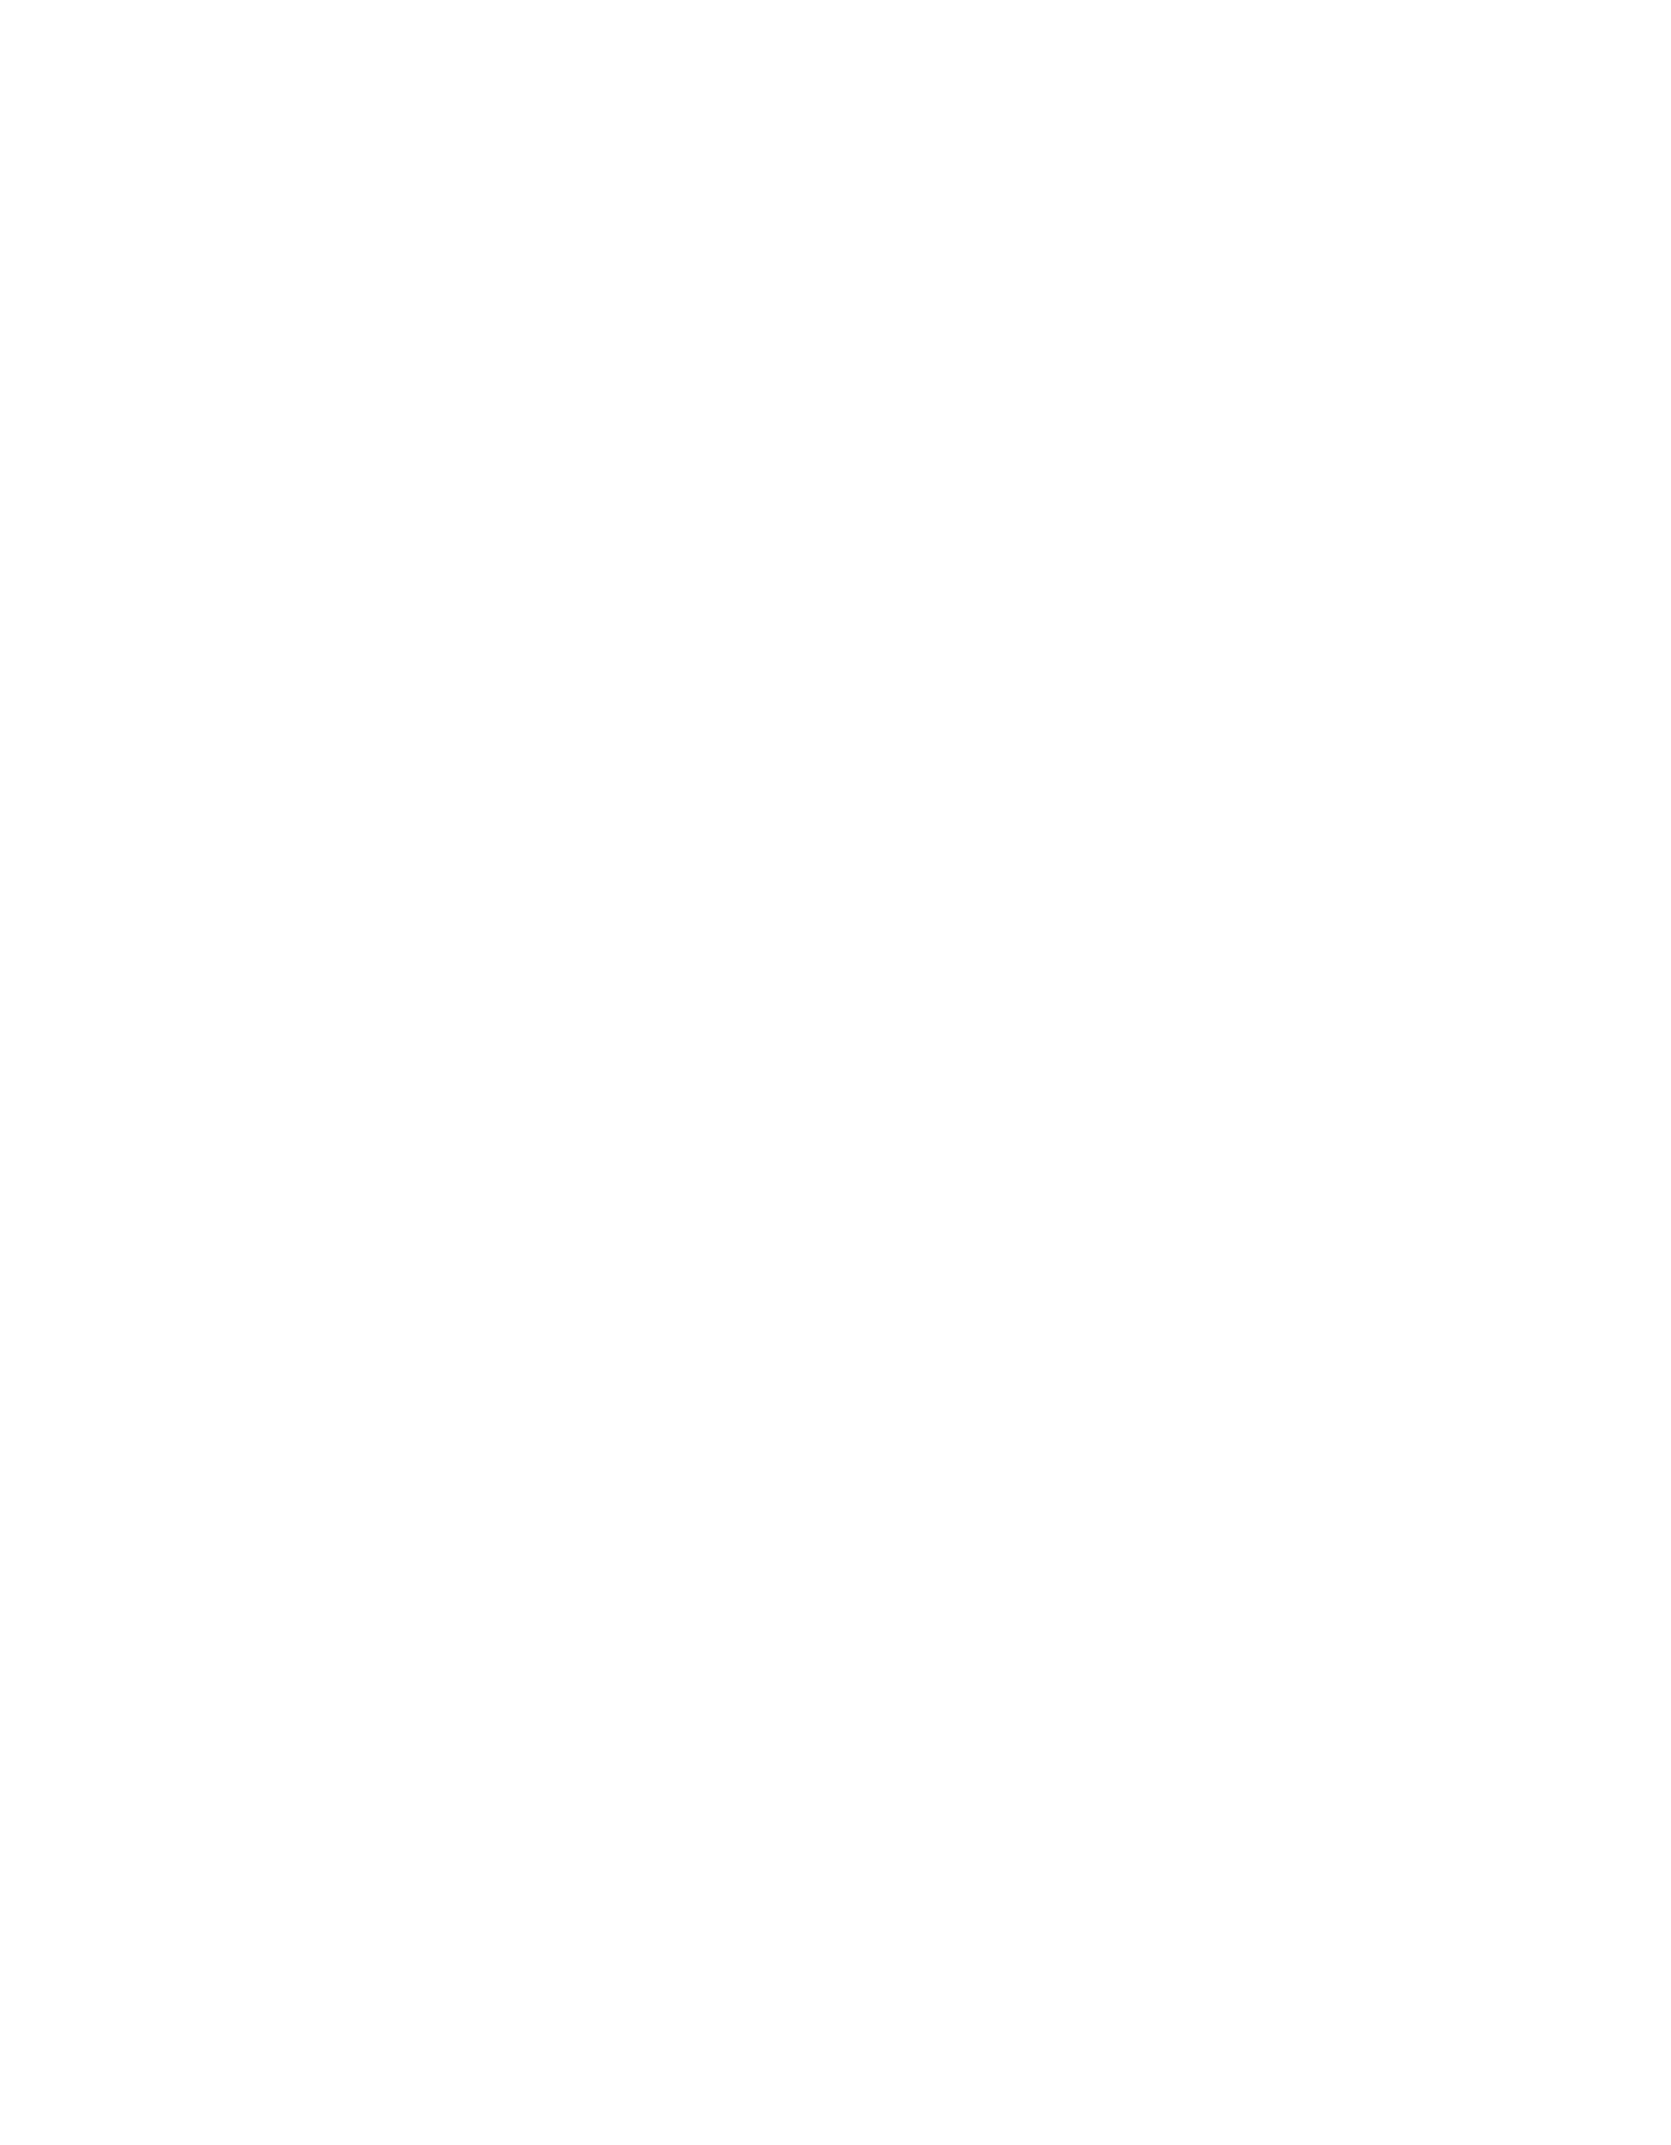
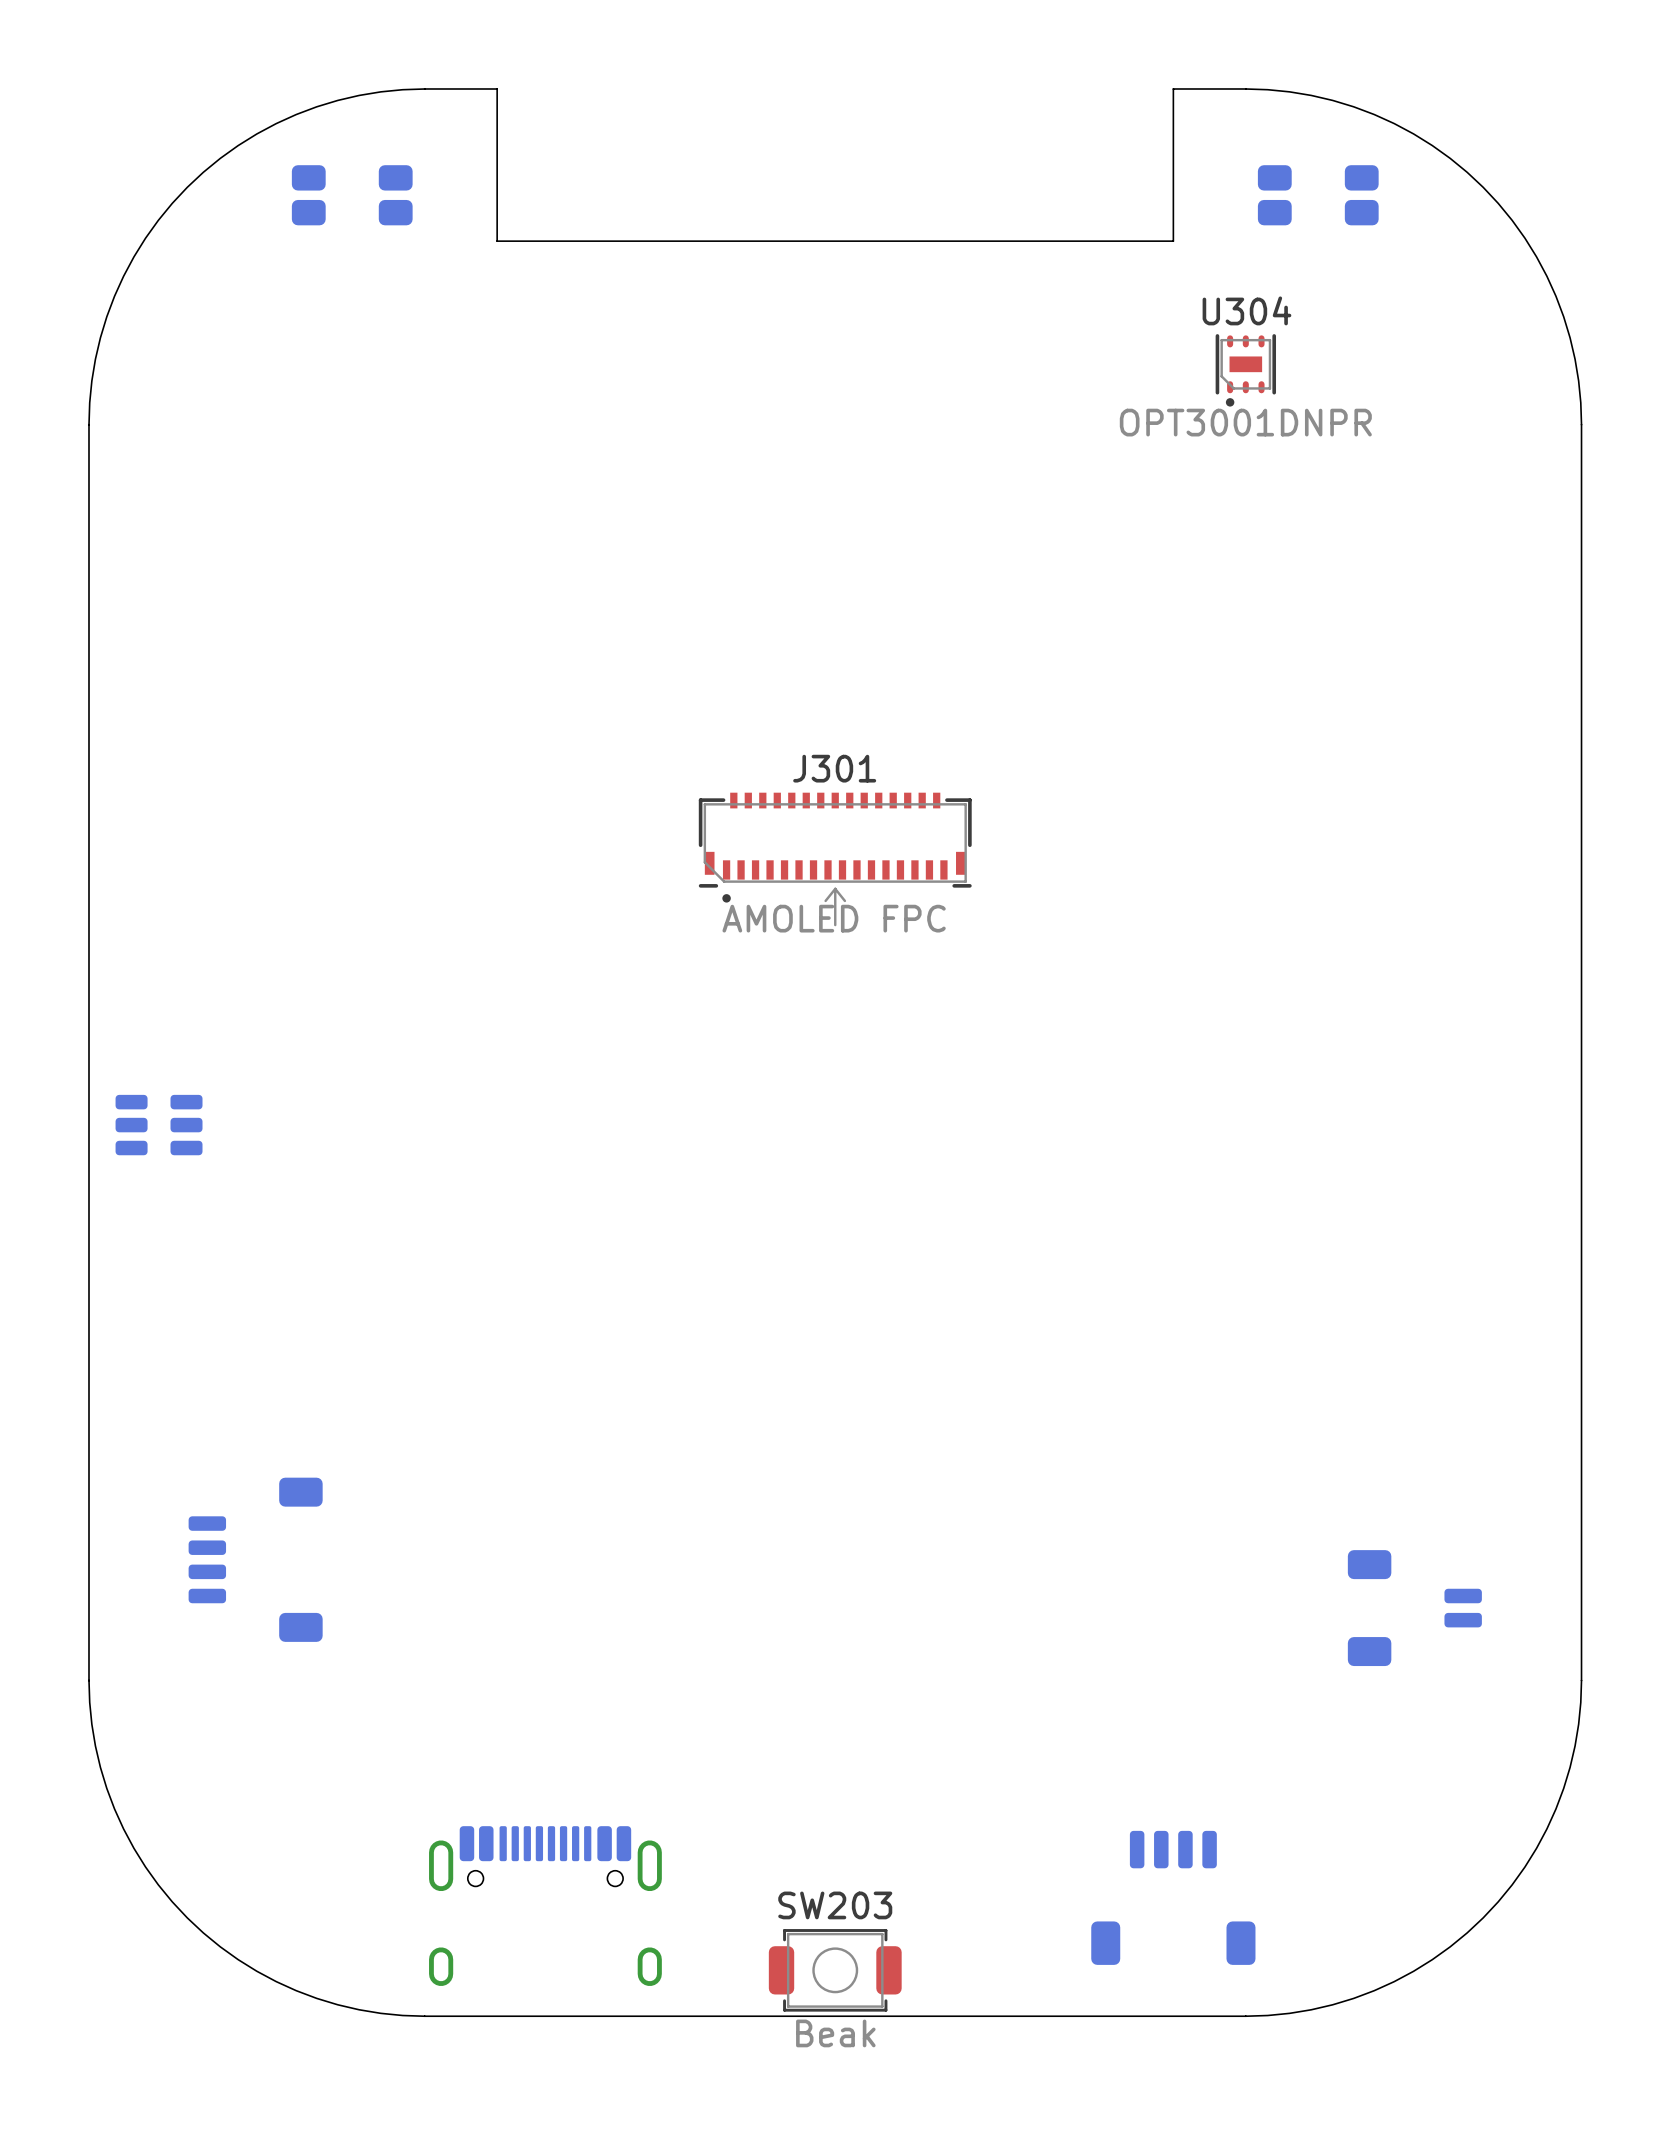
board edge: none -> (424, 88) (497, 88) (497, 241) (1173, 241) (1173, 88) (1267, 89) (1311, 95) (1374, 114) (1413, 133) (1450, 158) (1498, 203) (1524, 238) (1546, 276) (1563, 316) (1575, 359) (1581, 424) (1580, 1702) (1575, 1746) (1563, 1788) (1546, 1829) (1524, 1867) (1498, 1901) (1467, 1932) (1432, 1959) (1394, 1981) (1353, 1998) (1311, 2009) (1245, 2016) (424, 2016) (380, 2013) (337, 2004) (296, 1990) (256, 1971) (220, 1946) (187, 1917) (158, 1884) (123, 1829) (106, 1788) (95, 1746) (88, 1680) (88, 424) (95, 359) (114, 296) (145, 238) (187, 187) (220, 158) (256, 133) (316, 106) (359, 95) (424, 88)
part: none -> (352, 195)
part: none -> (1318, 195)
U304: none -> OPT3001DNPR (1245, 370)
J301: none -> AMOLED FPC (835, 859)
part: none -> (159, 1125)
part: none -> (255, 1559)
part: none -> (1414, 1608)
part: none -> (1173, 1897)
part: none -> (545, 1906)
SW203: none -> Beak (835, 1970)

